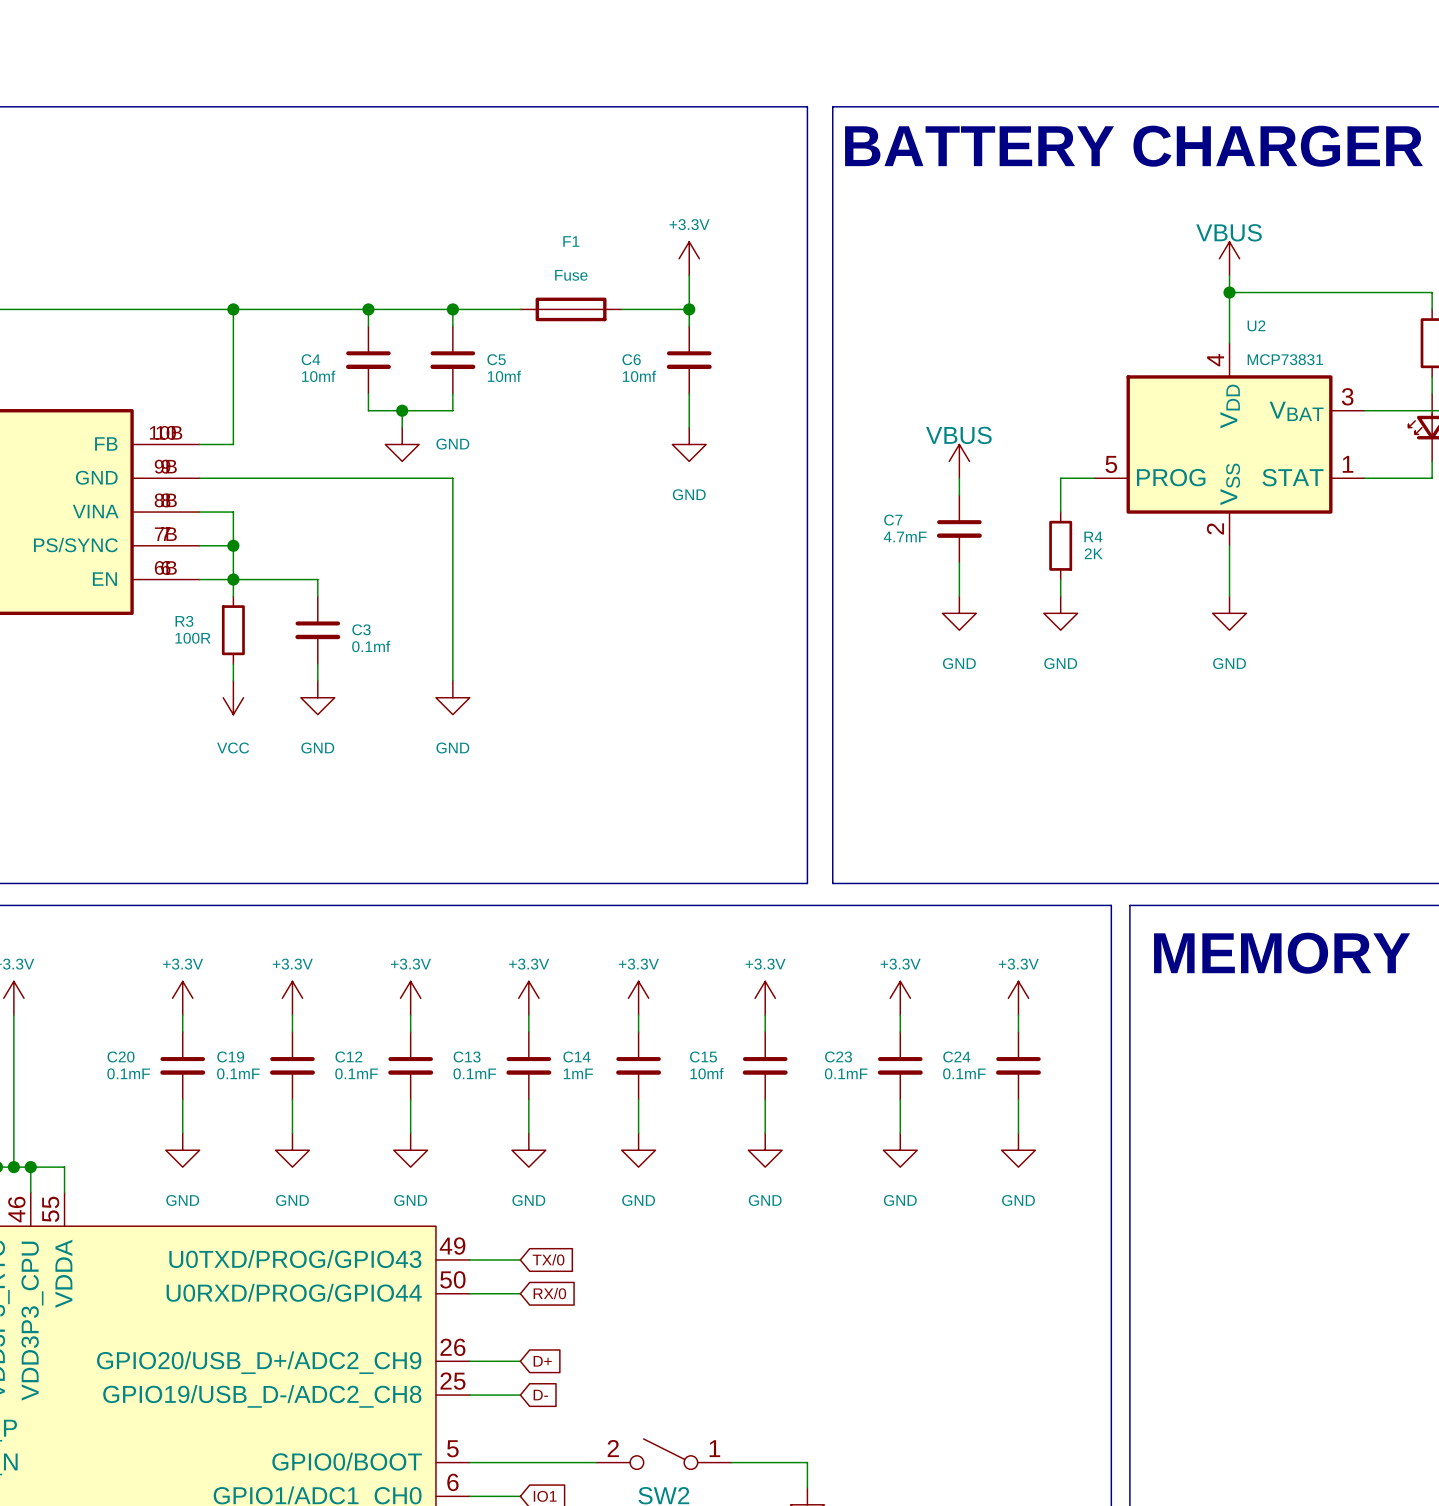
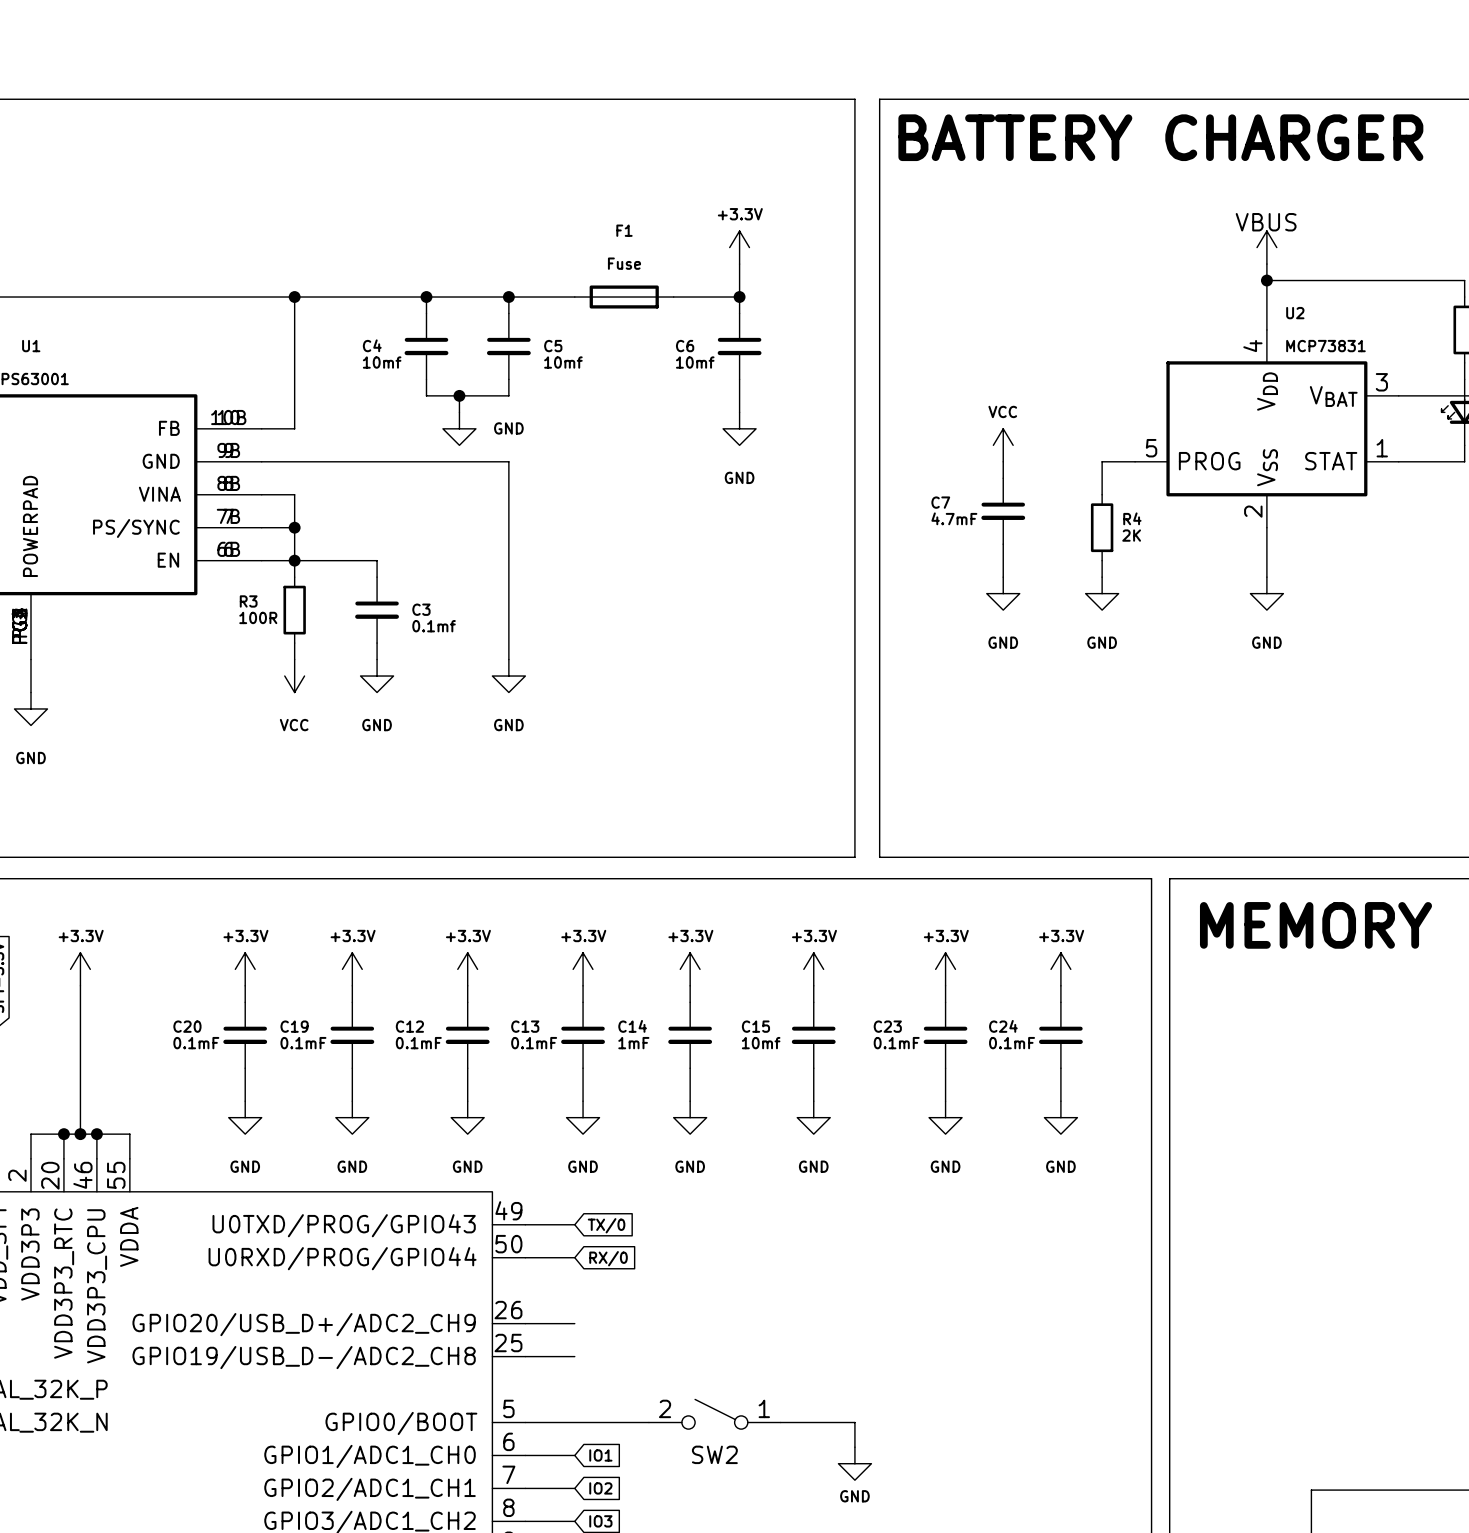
power symbol: VBUS (959, 461) -> VCC (1003, 445)
global label: D+ (542, 1361) -> none
global label: D- (540, 1395) -> none

